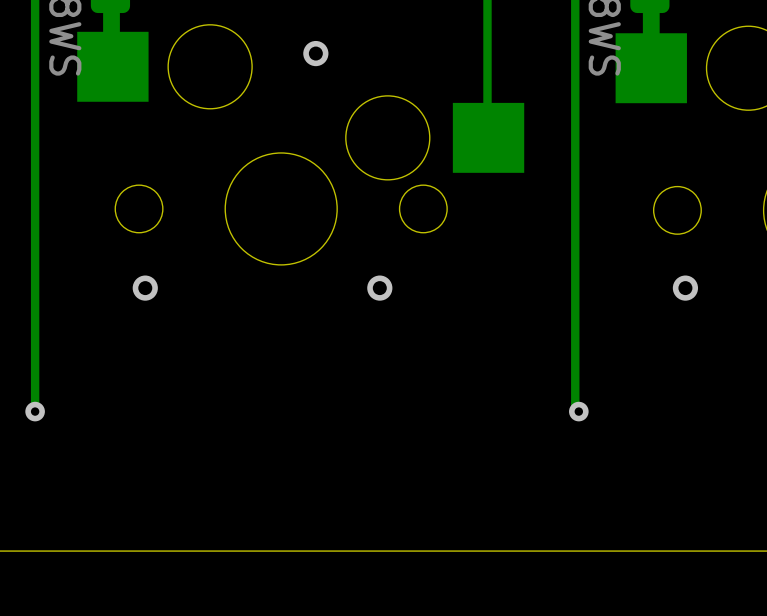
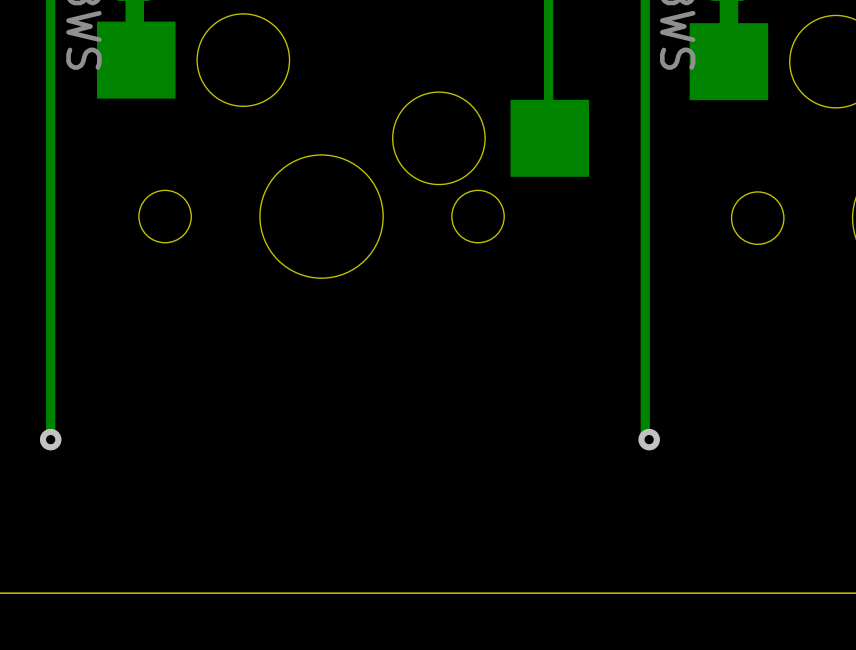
via: (315, 53) -> none
via: (145, 288) -> none
via: (379, 288) -> none
via: (685, 288) -> none

